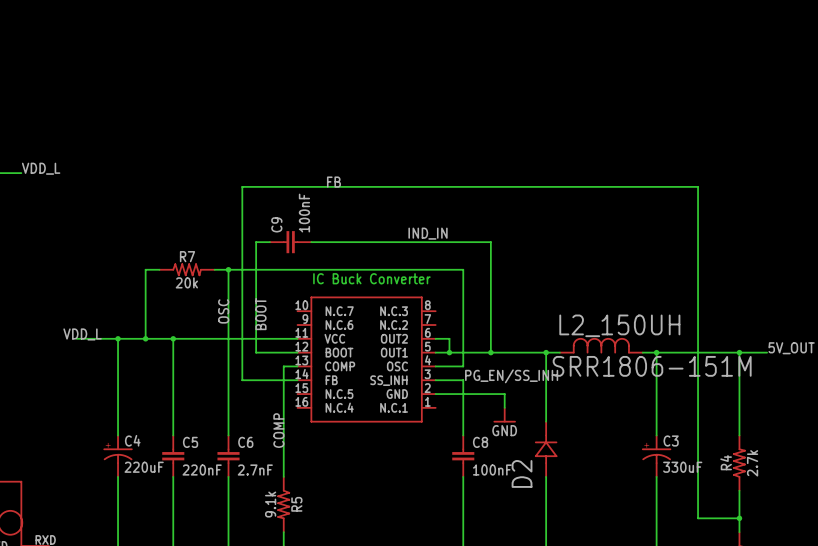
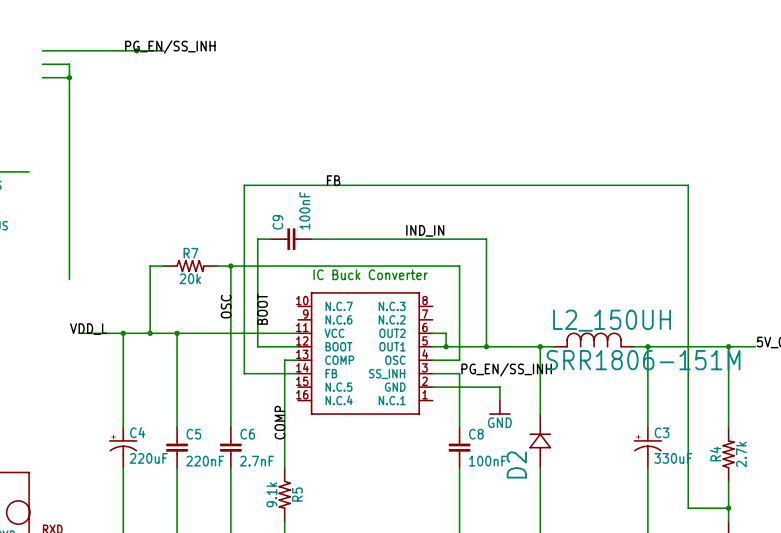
label: none -> PG_EN/SS_INH (170, 47)
wire: none -> (42, 50) (163, 50)
junction: none -> (136, 50)
wire: none -> (42, 64) (69, 64) (69, 279)
wire: none -> (42, 77) (69, 77)
junction: none -> (69, 77)
label: VDD_L (41, 168) -> none

